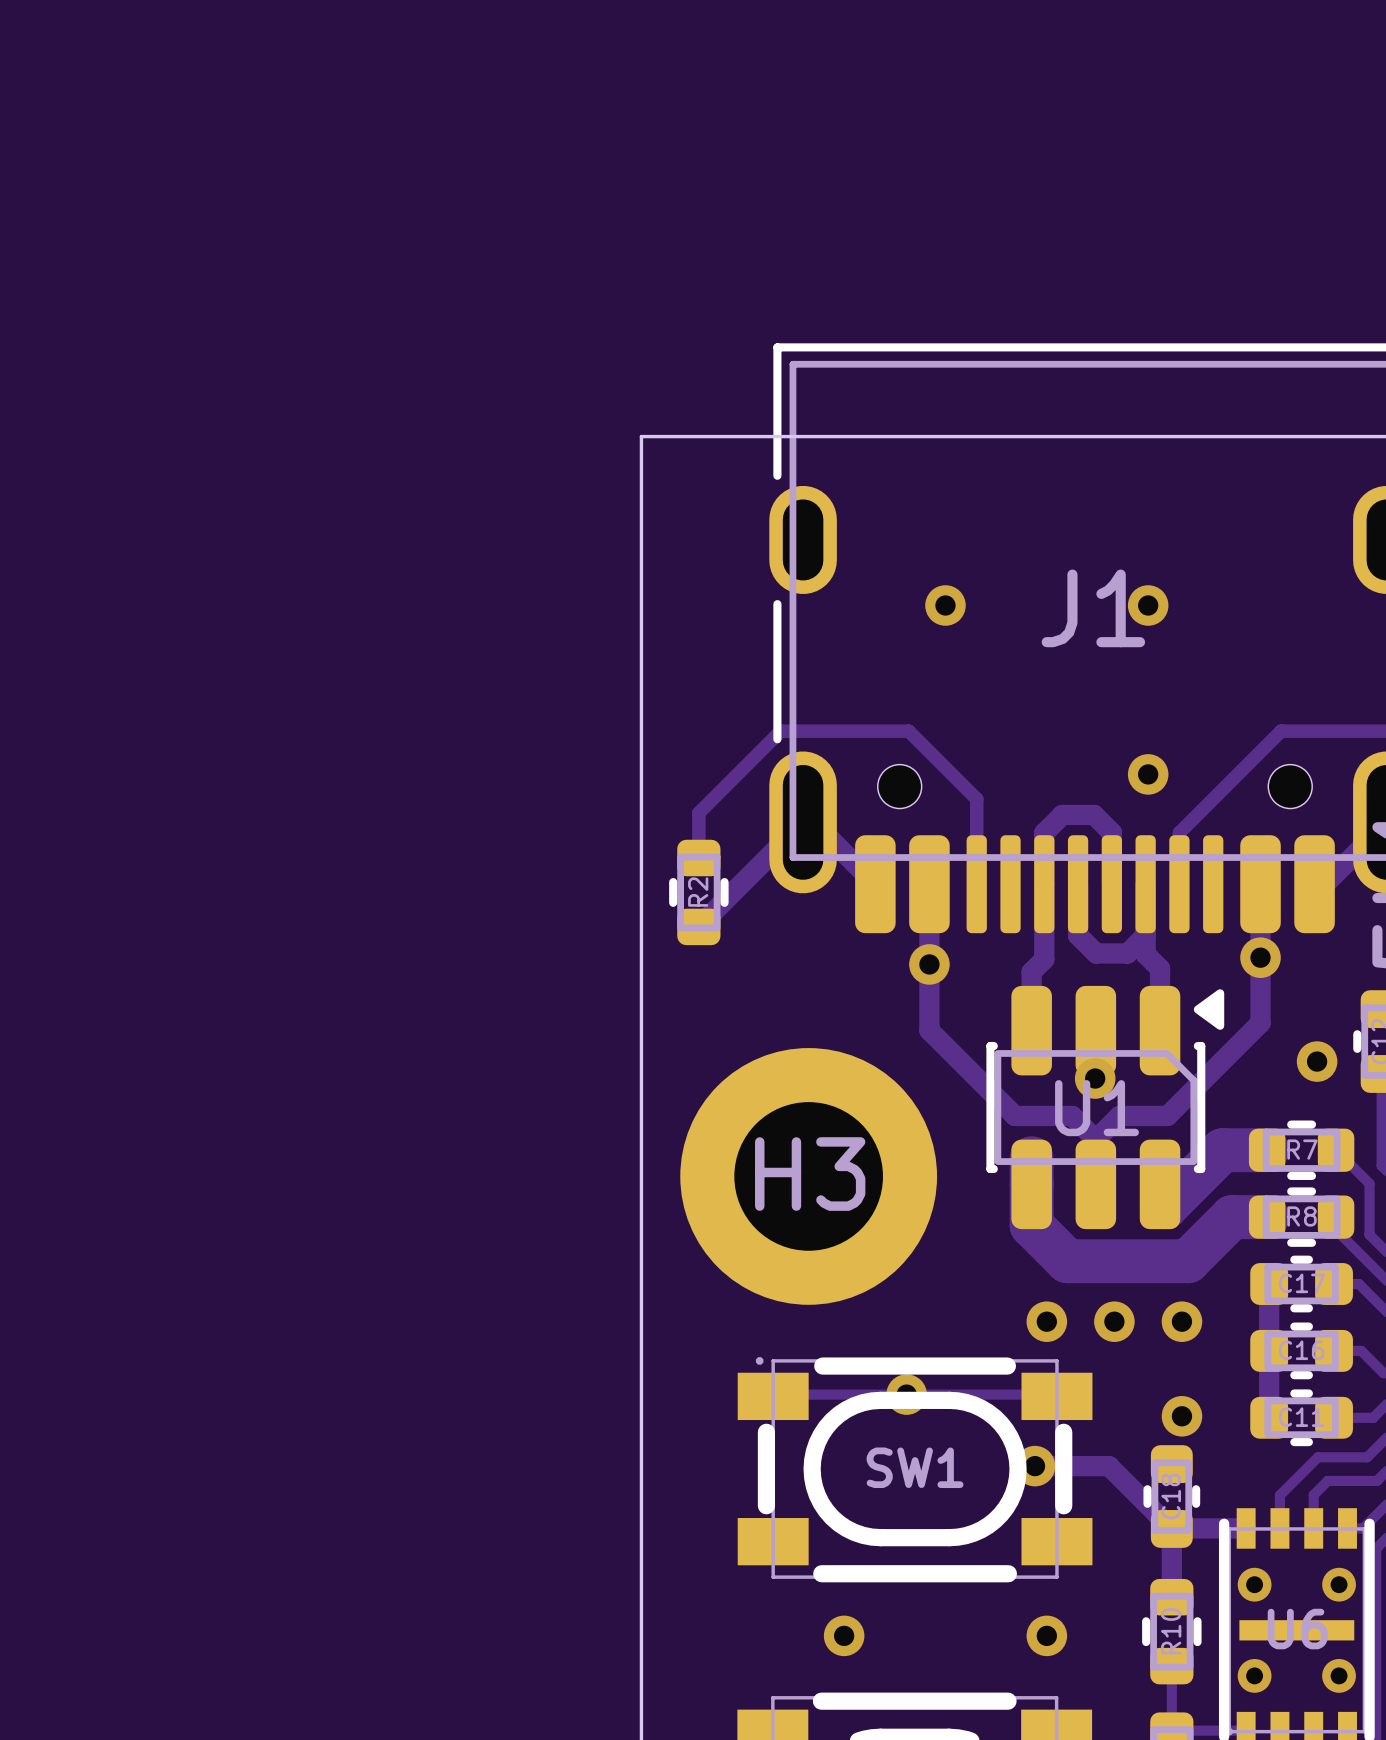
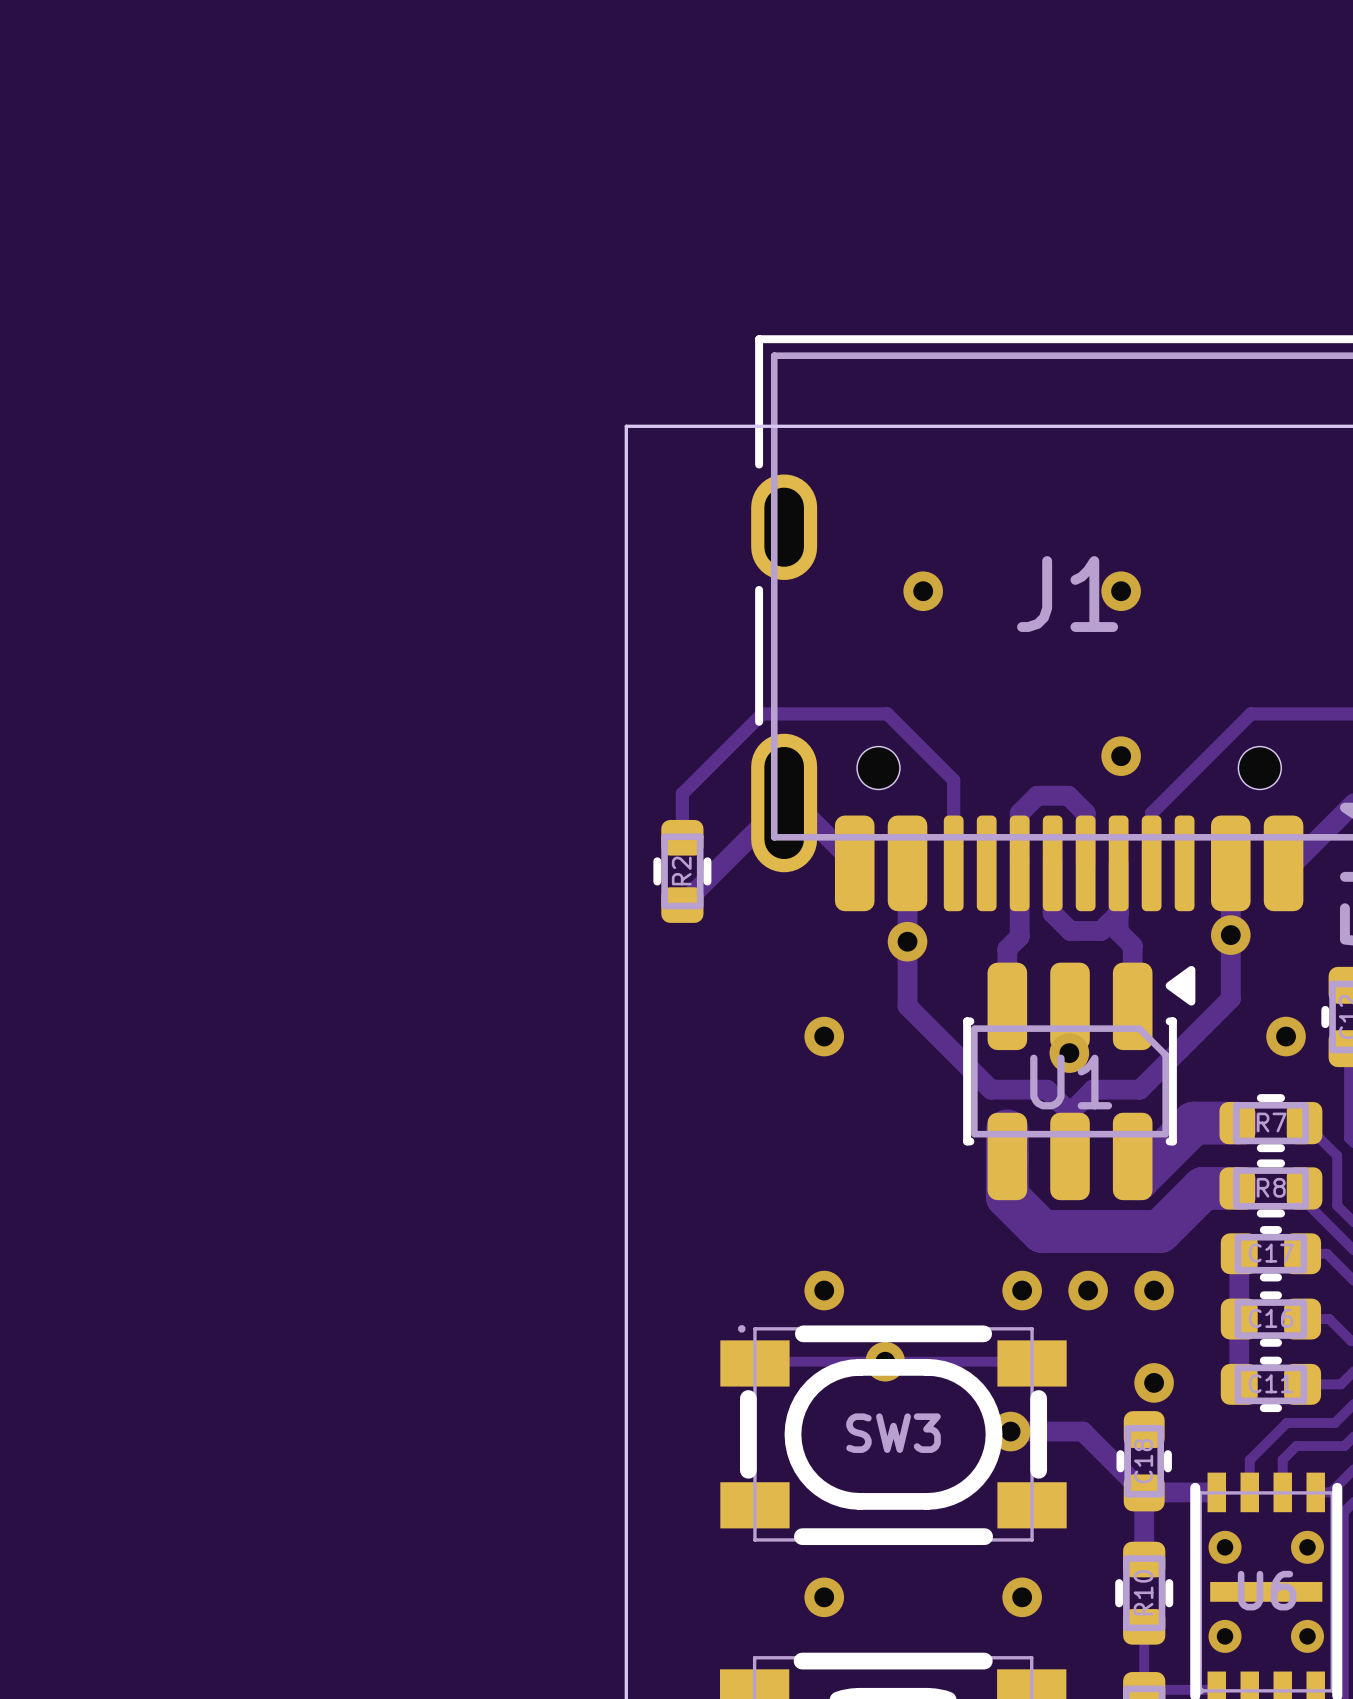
via: none -> (824, 1036)
H3: (808, 1176) -> none
via: none -> (824, 1290)
SW1 name: SW1 (915, 1467) -> SW3 (893, 1433)

